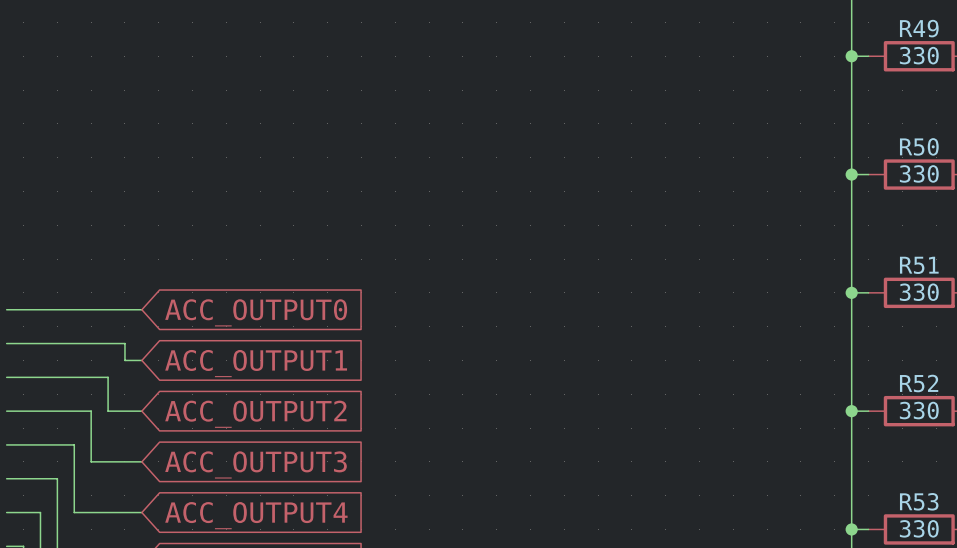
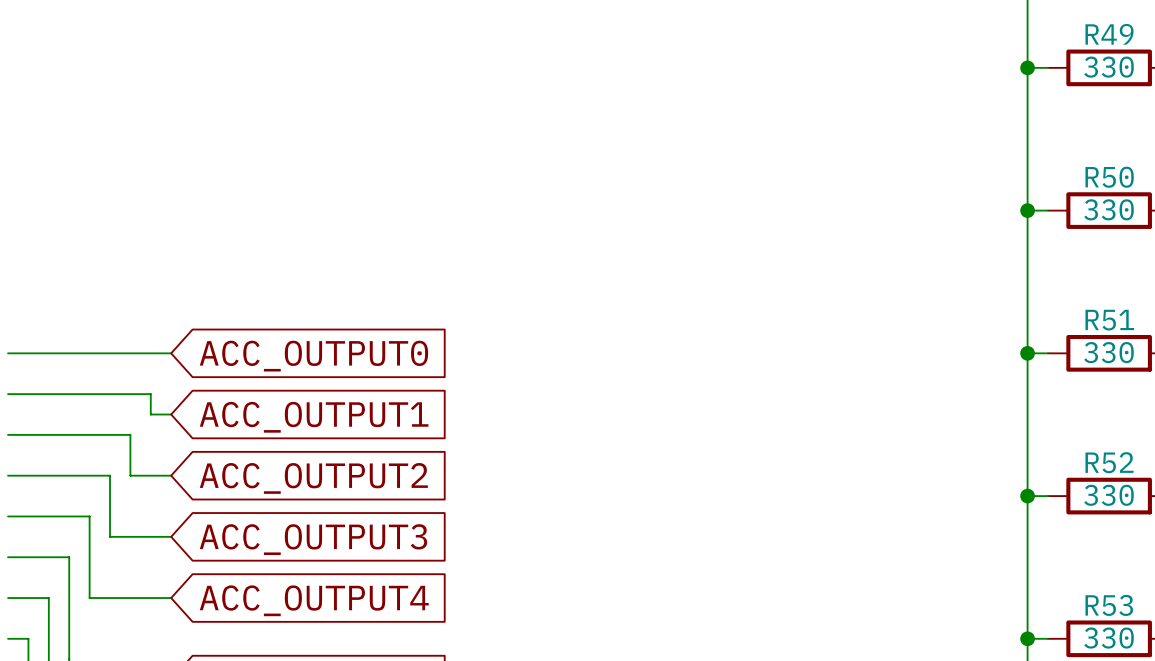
wire: (6, 309) (141, 309) -> (8, 353) (171, 353)
global label position: ACC_OUTPUT0 (256, 312) -> ACC_OUTPUT0 (313, 356)
wire: (6, 343) (124, 343) (124, 360) (141, 360) -> (8, 394) (150, 394) (150, 414) (171, 414)
global label position: ACC_OUTPUT1 (256, 363) -> ACC_OUTPUT1 (314, 417)
wire: (6, 377) (108, 377) -> (8, 434) (130, 434) (130, 455)
wire: (108, 394) (108, 411) (141, 411) -> (130, 475) (171, 475)
wire: (6, 411) (91, 411) -> (8, 475) (110, 475) (110, 496)
global label position: ACC_OUTPUT2 (255, 414) -> ACC_OUTPUT2 (313, 478)
wire: (6, 444) (74, 444) -> (8, 516) (89, 516) (89, 536)
wire: (91, 444) (91, 461) (141, 461) -> (110, 536) (171, 536)
global label position: ACC_OUTPUT3 (256, 464) -> ACC_OUTPUT3 (313, 539)
wire: (6, 478) (57, 478) -> (8, 557) (69, 557) (69, 577)
wire: (74, 495) (74, 512) (141, 512) -> (89, 598) (171, 598)
wire: (6, 512) (40, 512) -> (8, 598) (48, 598) (48, 618)
global label position: ACC_OUTPUT4 (256, 515) -> ACC_OUTPUT4 (314, 600)
wire: (6, 546) (23, 546) -> (8, 638) (28, 638) (28, 659)

